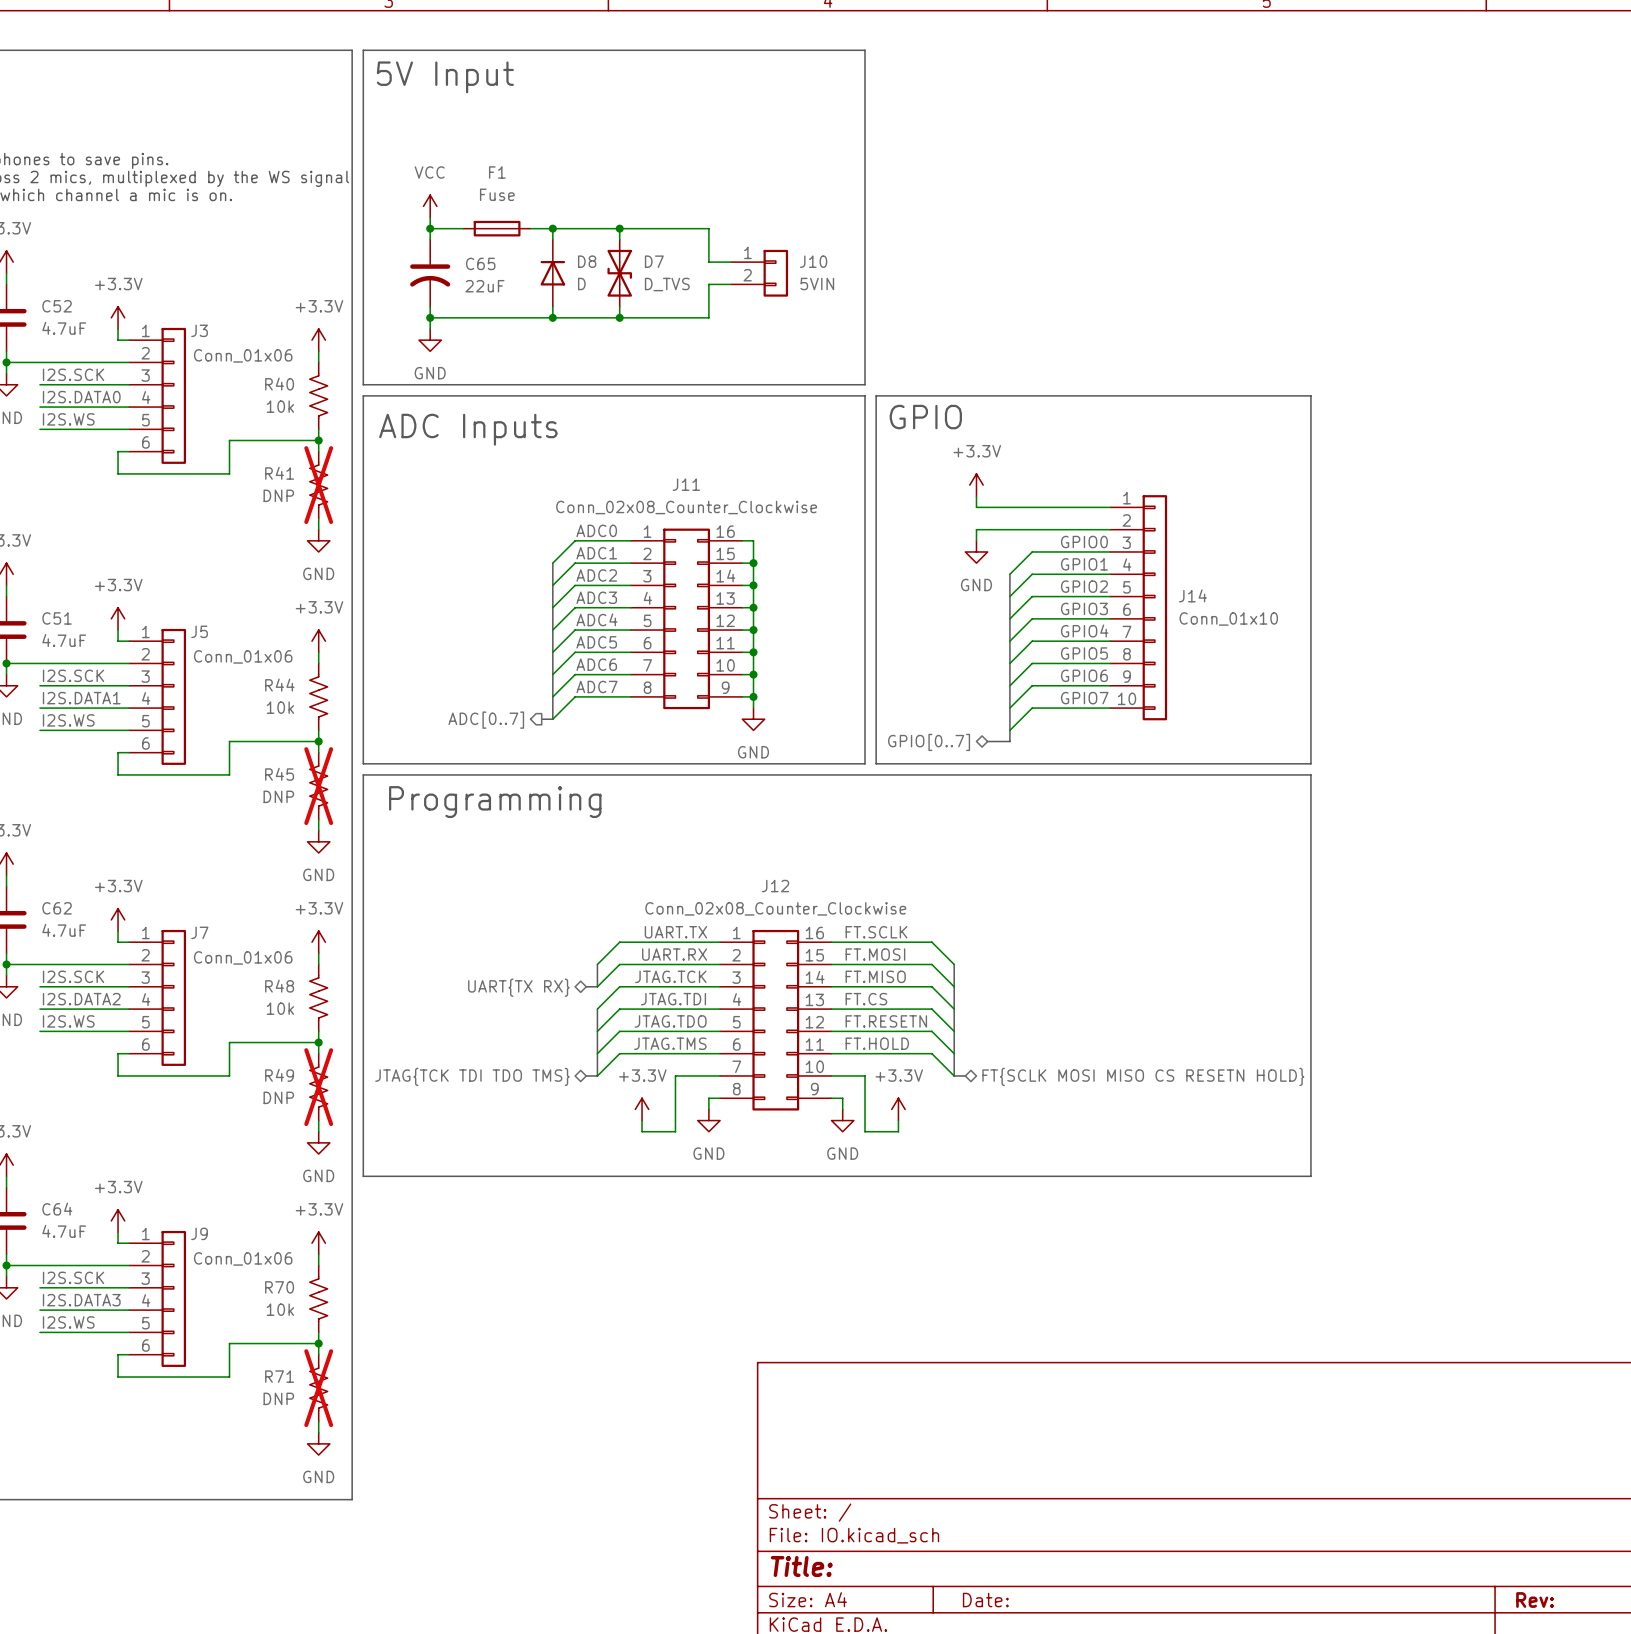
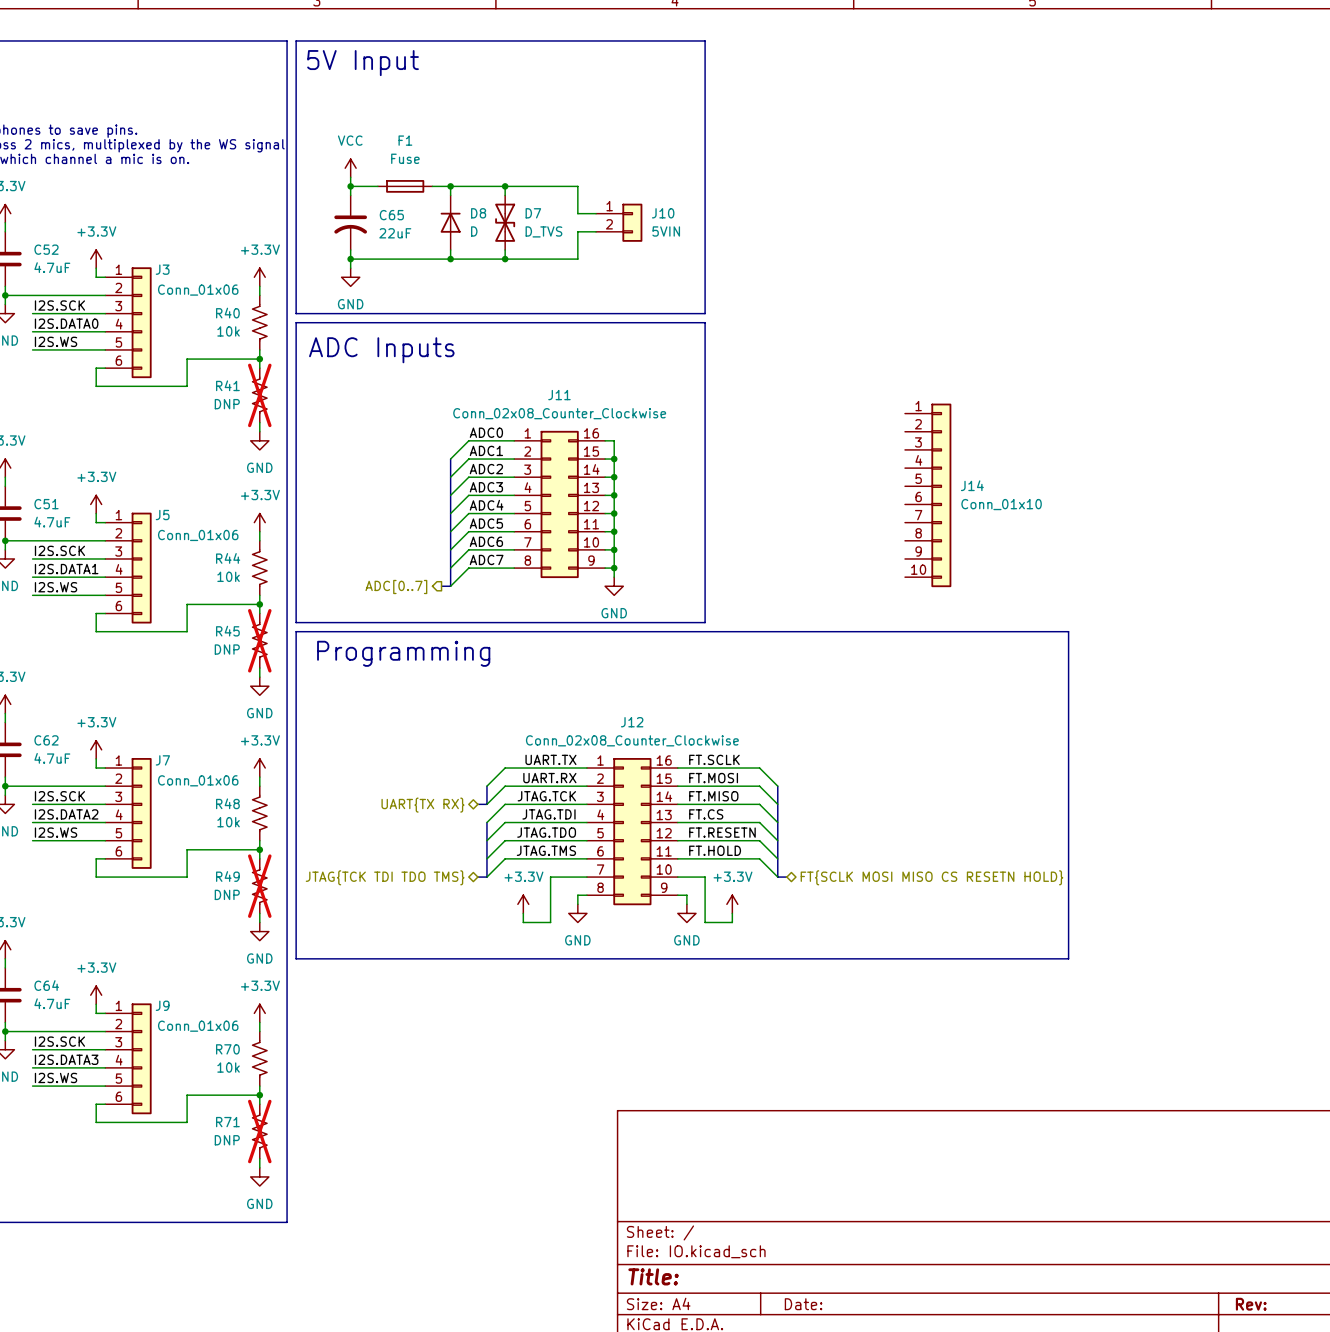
line: (876, 395) (1310, 395) (1310, 763) (876, 763) (876, 395) -> none
text: GPIO (925, 417) -> none
power symbol: +3.3V (976, 485) -> none
wire: (976, 496) (976, 507) (1110, 507) -> none
wire: (1110, 529) (976, 529) (976, 540) -> none
label: GPIO0 (1084, 542) -> none
power symbol: GND (976, 551) -> none
wire: (1110, 551) (1032, 551) (1009, 574) -> none
label: GPIO1 (1084, 564) -> none
bus: (1009, 574) (1009, 741) (987, 741) -> none
wire: (1110, 574) (1032, 574) (1009, 596) -> none
label: GPIO2 (1084, 586) -> none
wire: (1110, 596) (1032, 596) (1009, 618) -> none
label: GPIO3 (1084, 608) -> none
wire: (1110, 618) (1032, 618) (1009, 641) -> none
label: GPIO4 (1084, 630) -> none
wire: (1110, 641) (1032, 641) (1009, 663) -> none
label: GPIO5 (1084, 653) -> none
wire: (1110, 663) (1032, 663) (1009, 685) -> none
label: GPIO6 (1084, 675) -> none
wire: (1110, 685) (1032, 685) (1009, 708) -> none
label: GPIO7 (1084, 698) -> none
wire: (1110, 708) (1032, 708) (1009, 730) -> none
hierarchical label: GPIO[0..7] (929, 742) -> none

